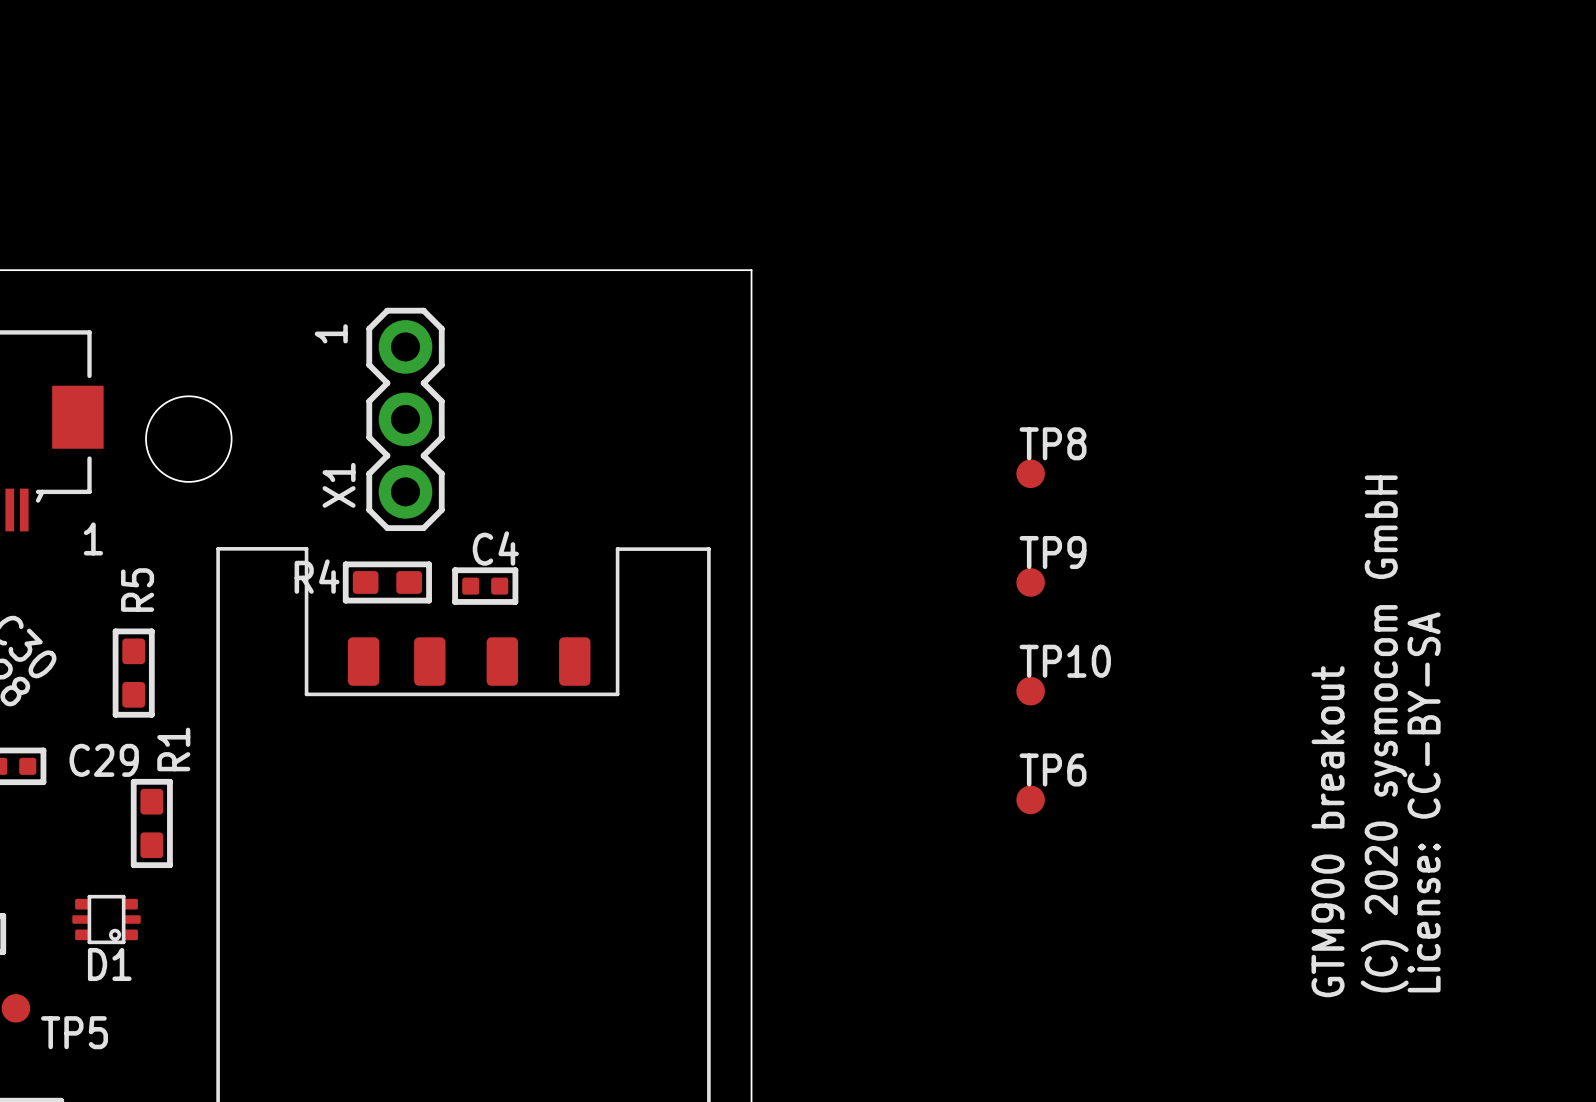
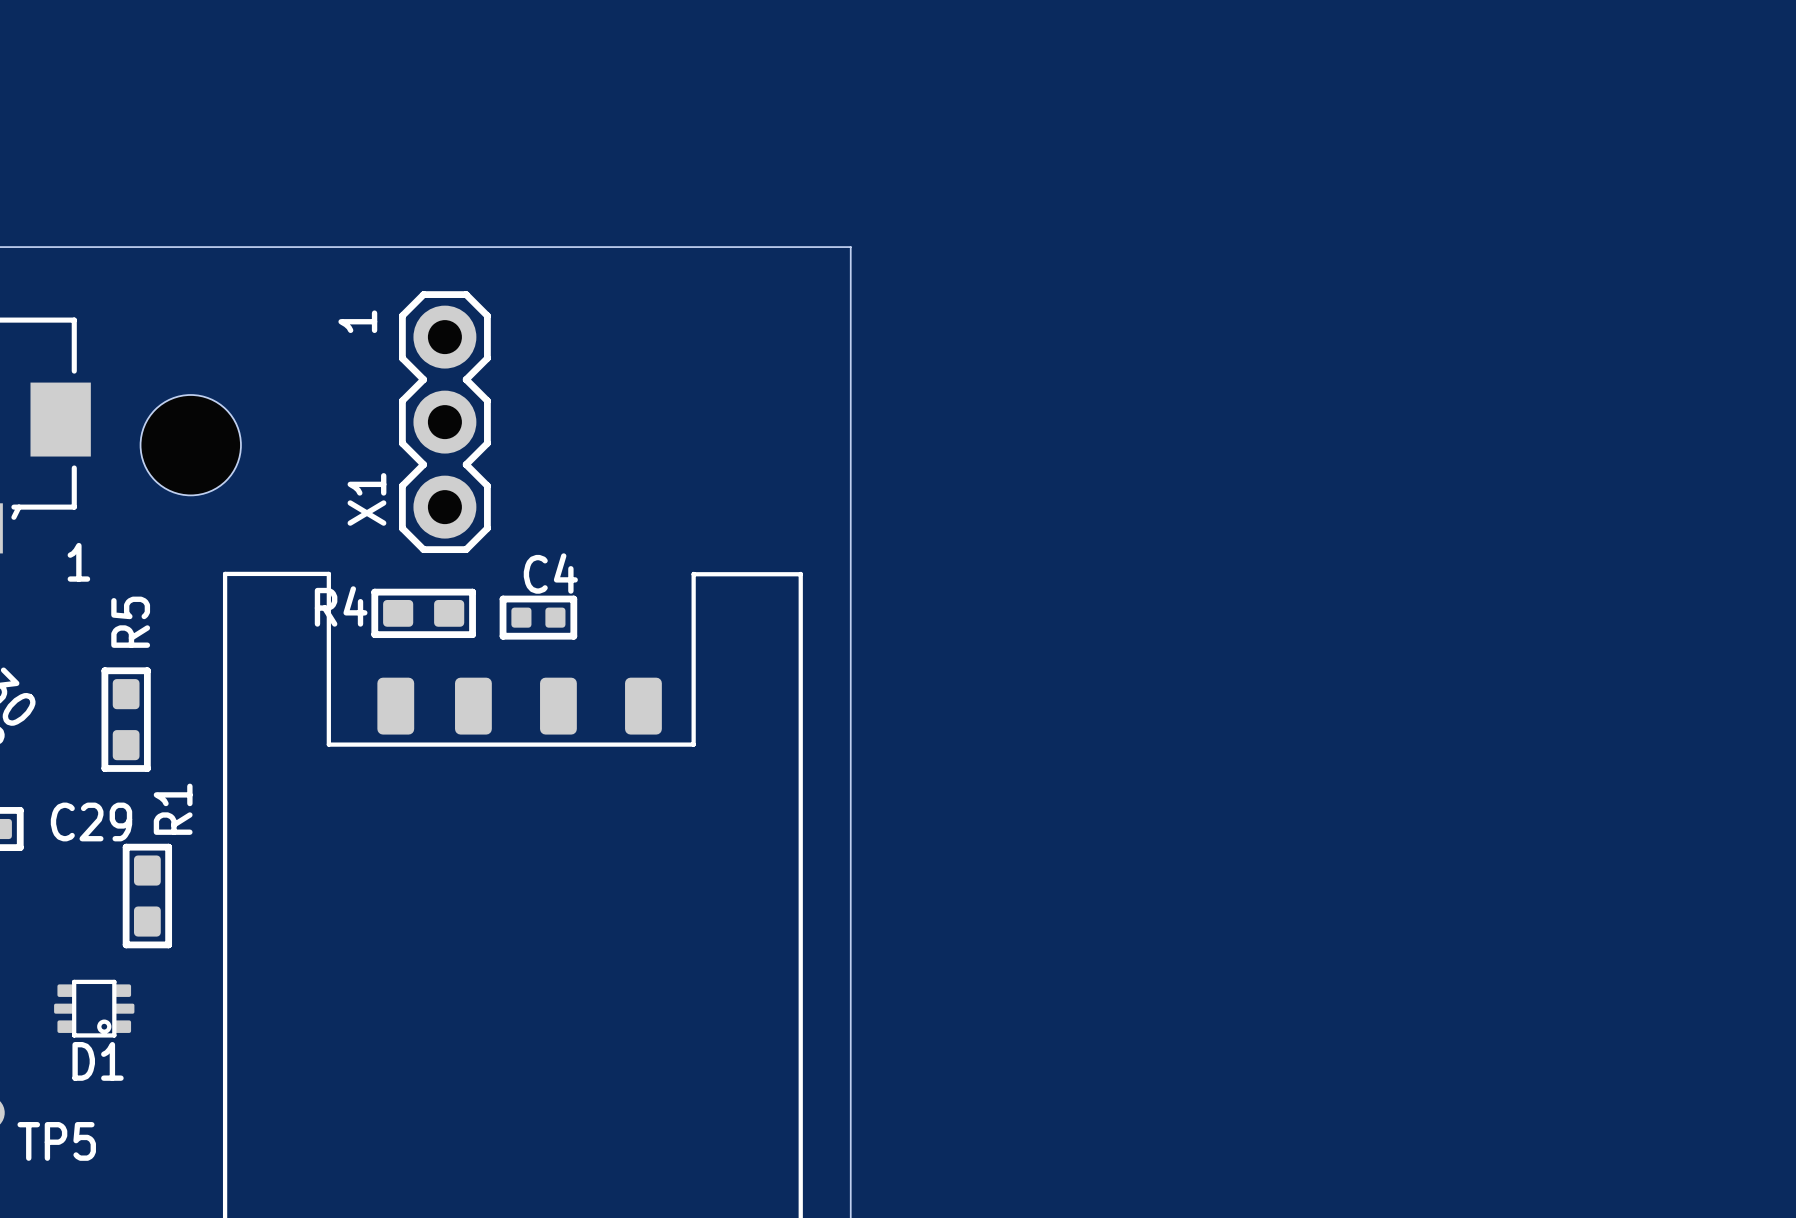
TP8: (1030, 473) -> none
TP9: (1030, 582) -> none
TP10: (1030, 691) -> none
text: (C) 2020 sysmocom GmbH (1384, 733) -> none
TP6: (1030, 799) -> none
text: License: CC-BY-SA (1424, 802) -> none
text: GTM900 breakout (1328, 831) -> none

